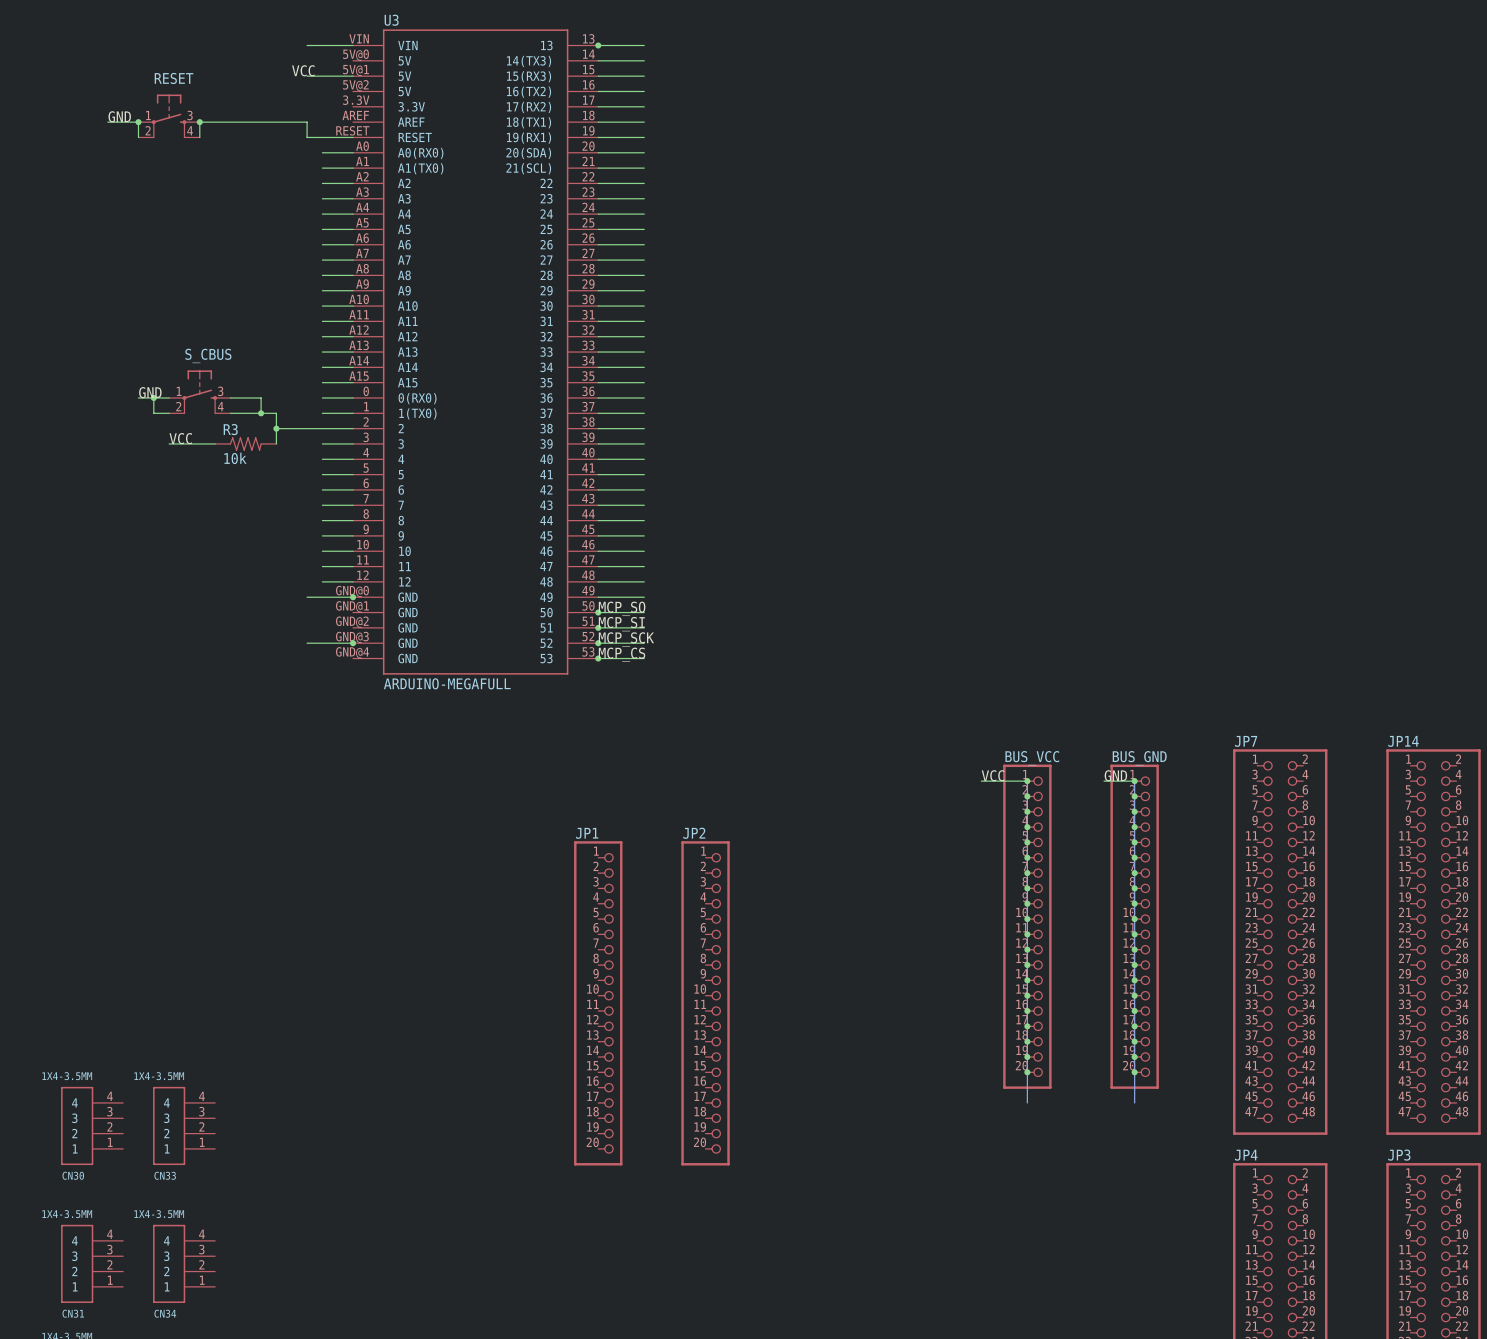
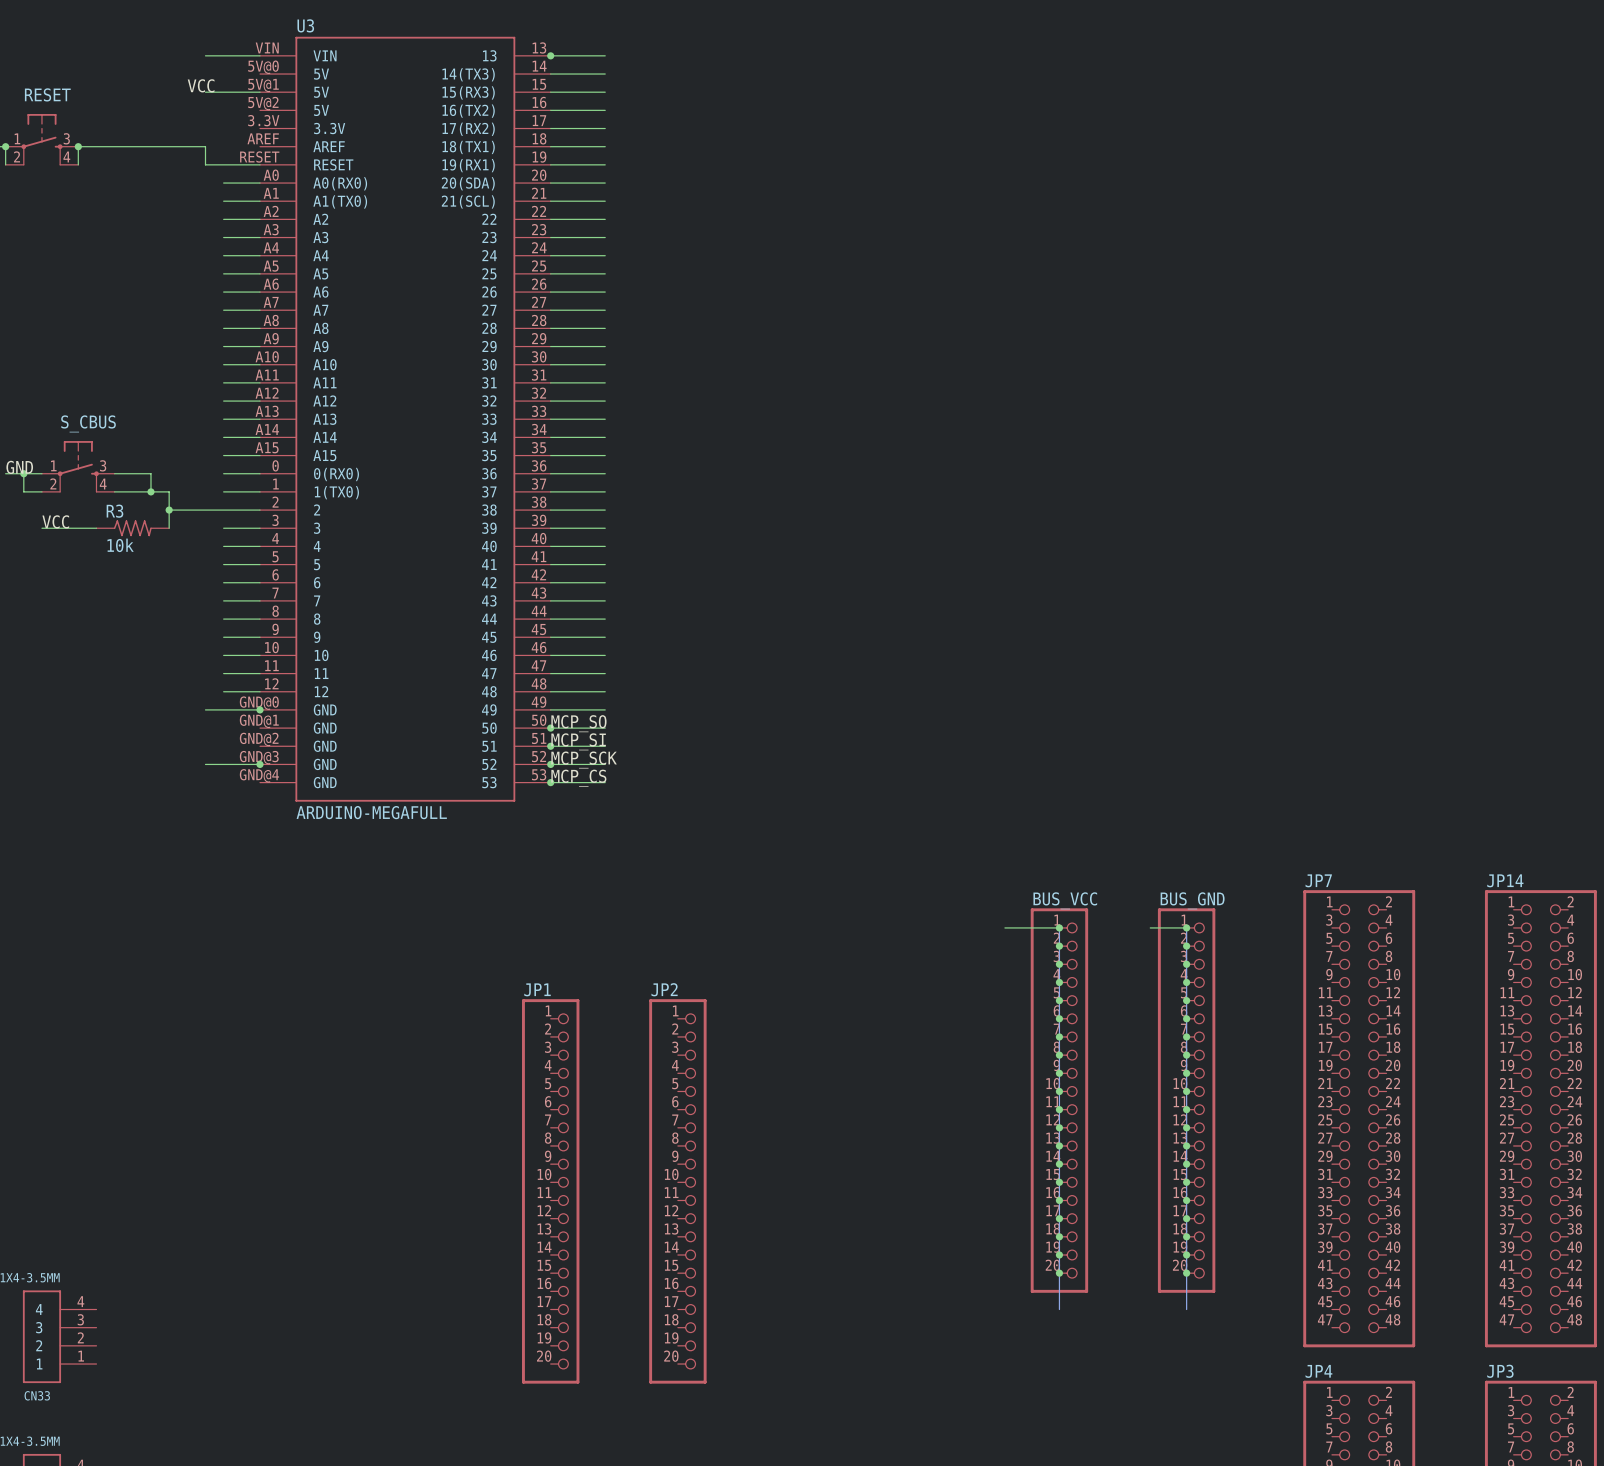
label: VCC (993, 775) -> none
label: GND (1115, 775) -> none

